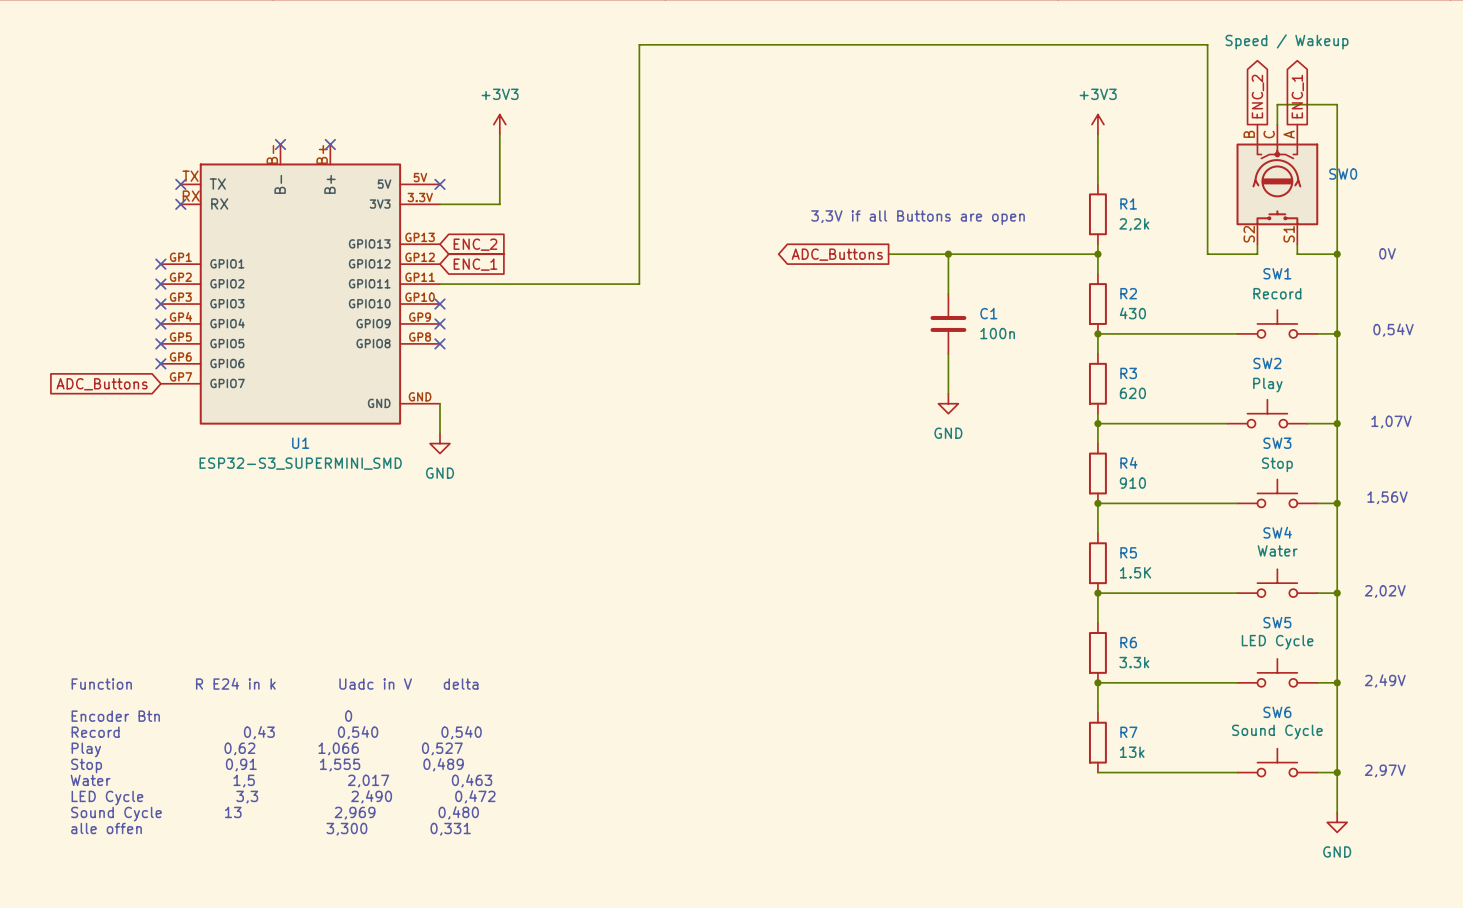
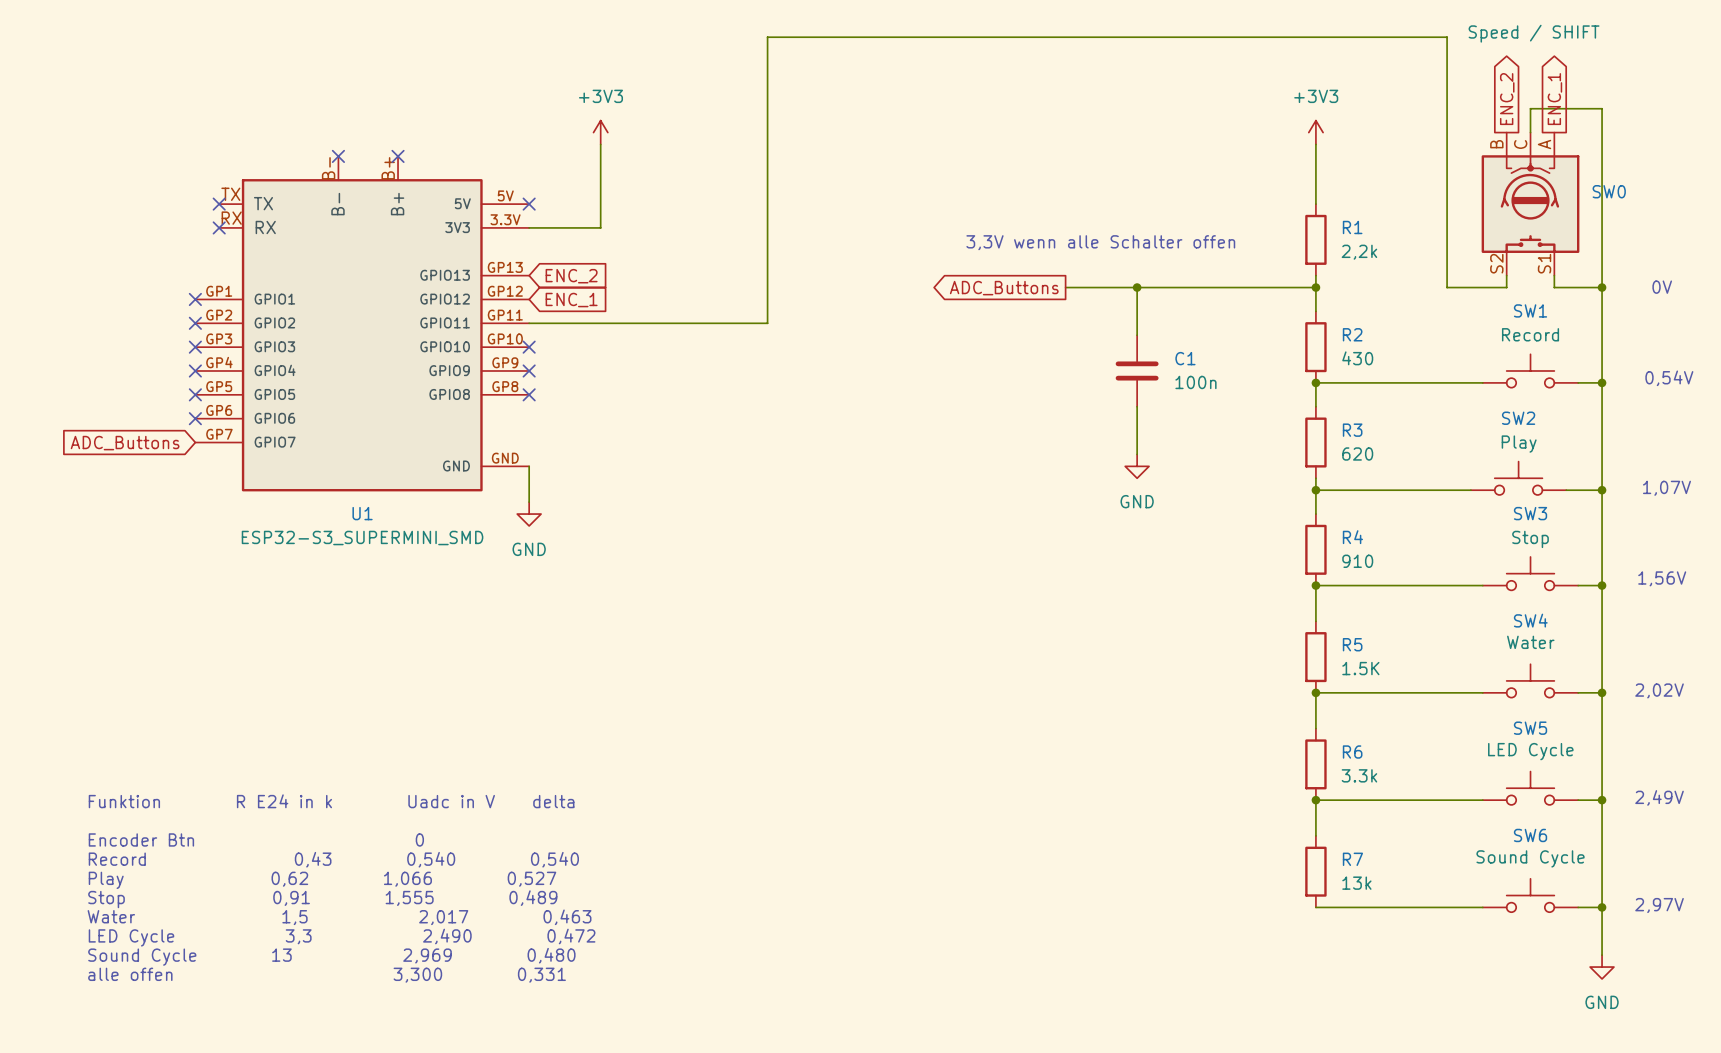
SW0 value: Speed / Wakeup (1287, 41) -> Speed / SHIFT (1534, 33)
text: 3,3V if all Buttons are open (918, 217) -> 3,3V wenn alle Schalter offen (1100, 242)
text: Function R E24 in k Uadc in V delta (275, 683) -> Funktion R E24 in k Uadc in V delta (331, 801)

